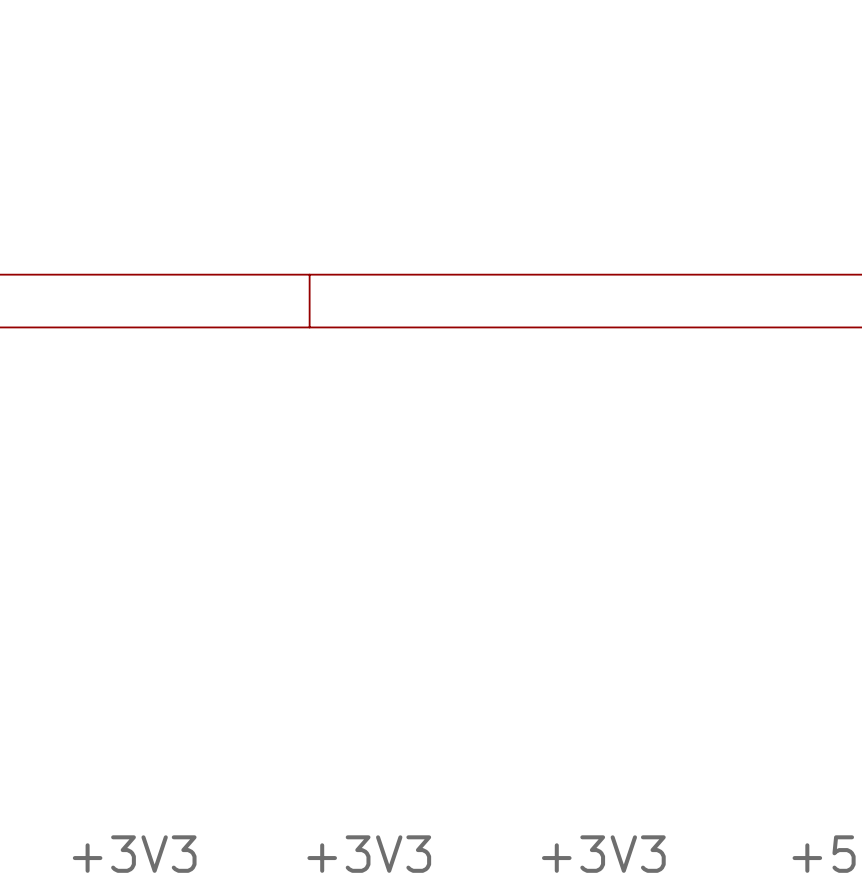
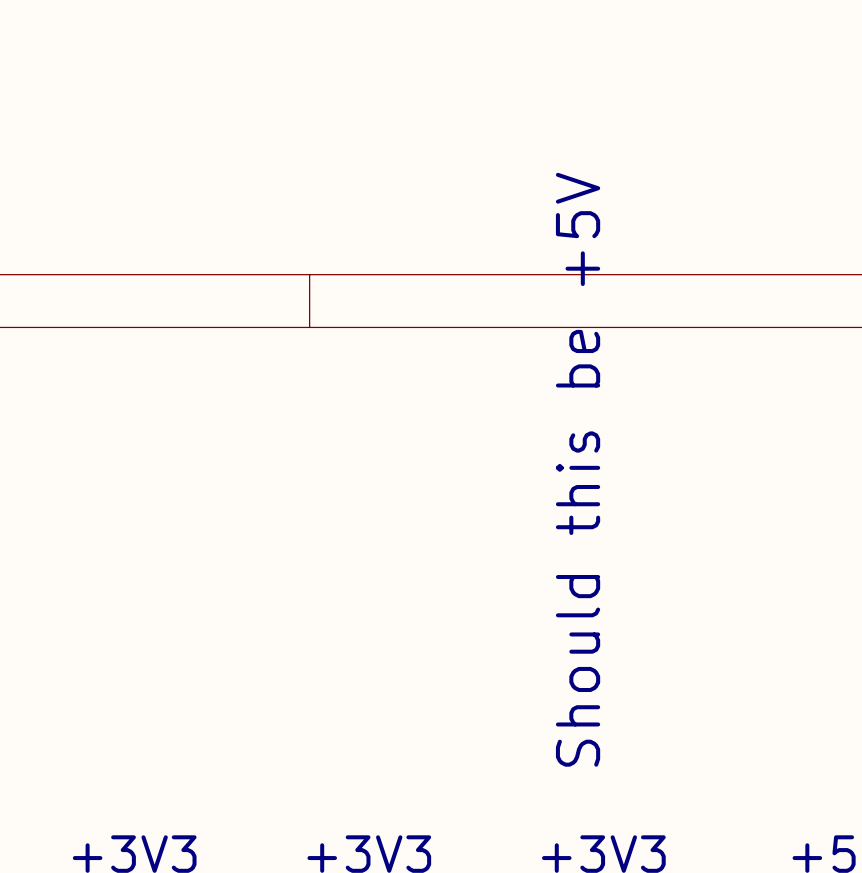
text: none -> Should this be +5V (578, 469)

